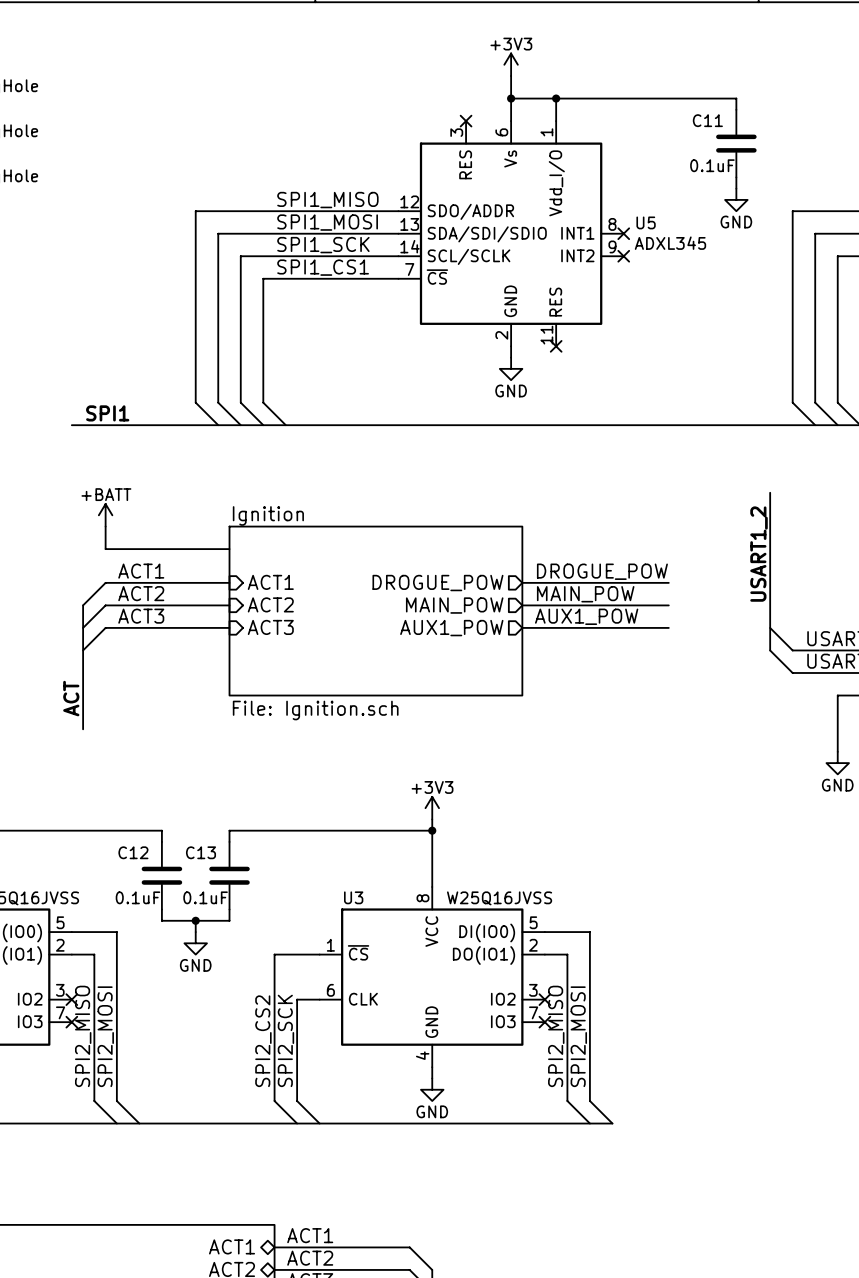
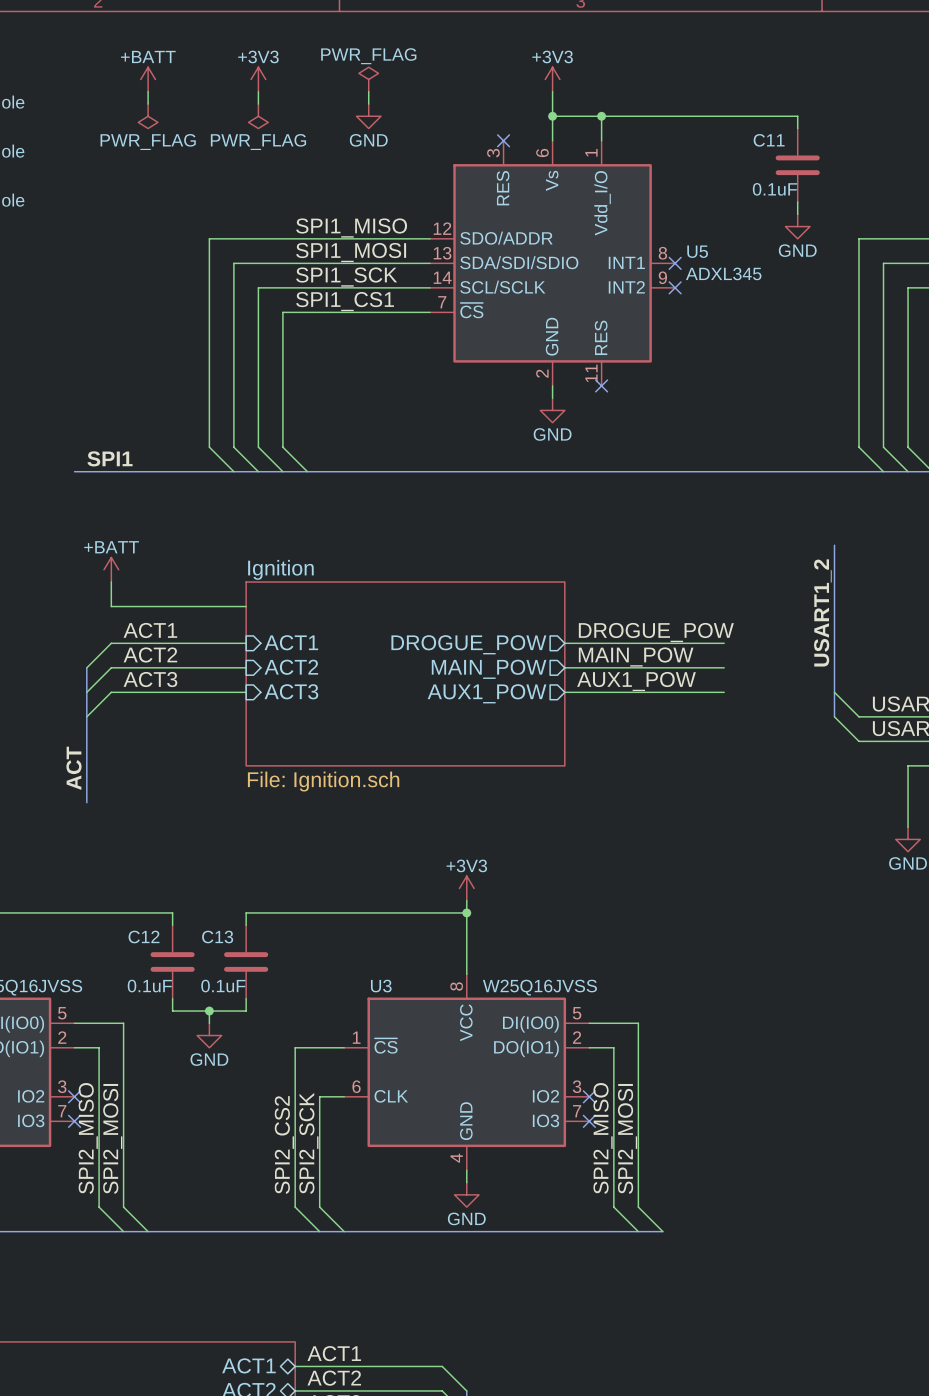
power symbol: none -> +BATT (148, 79)
power symbol: none -> +3V3 (258, 79)
power symbol: none -> PWR_FLAG (368, 79)
wire: none -> (148, 91) (148, 104)
wire: none -> (258, 91) (258, 104)
wire: none -> (368, 91) (368, 104)
power symbol: none -> PWR_FLAG (148, 116)
power symbol: none -> PWR_FLAG (258, 116)
power symbol: none -> GND (368, 116)

